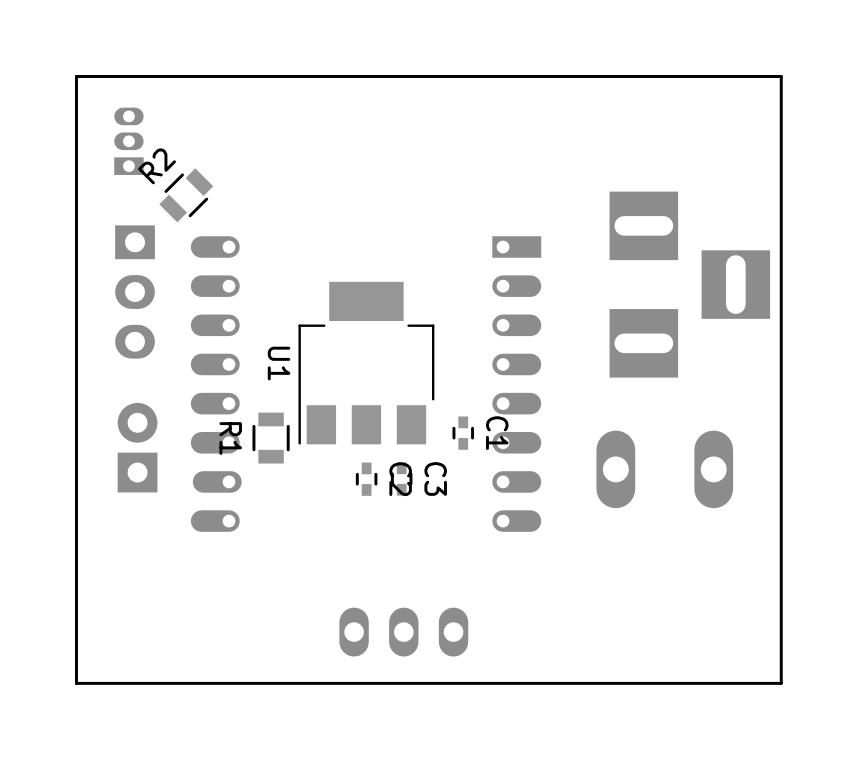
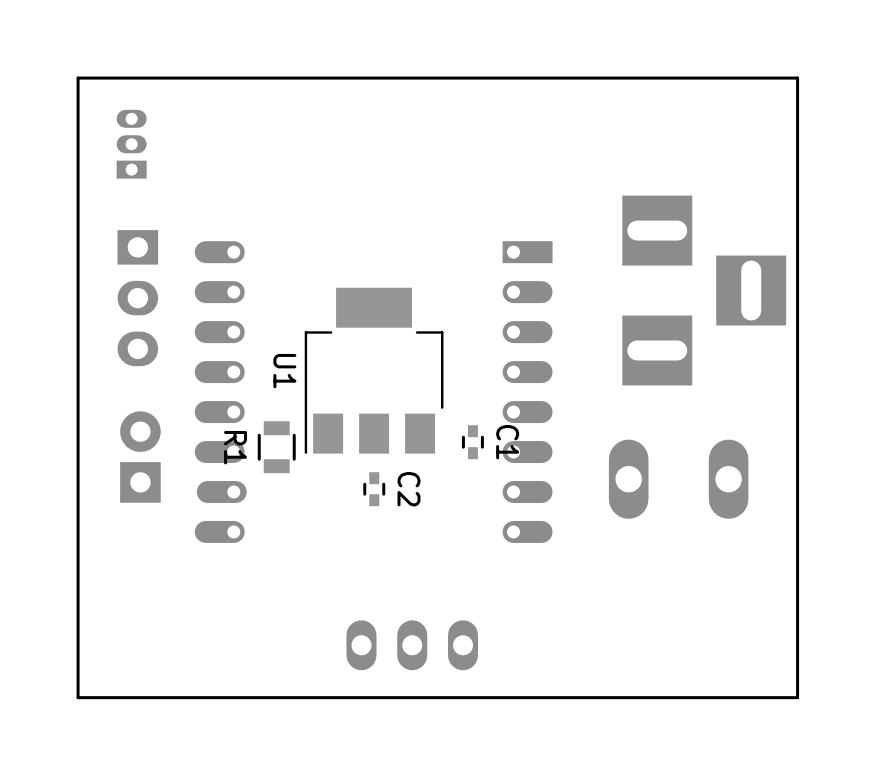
R2: (186, 195) -> none
C3: (401, 478) -> none

